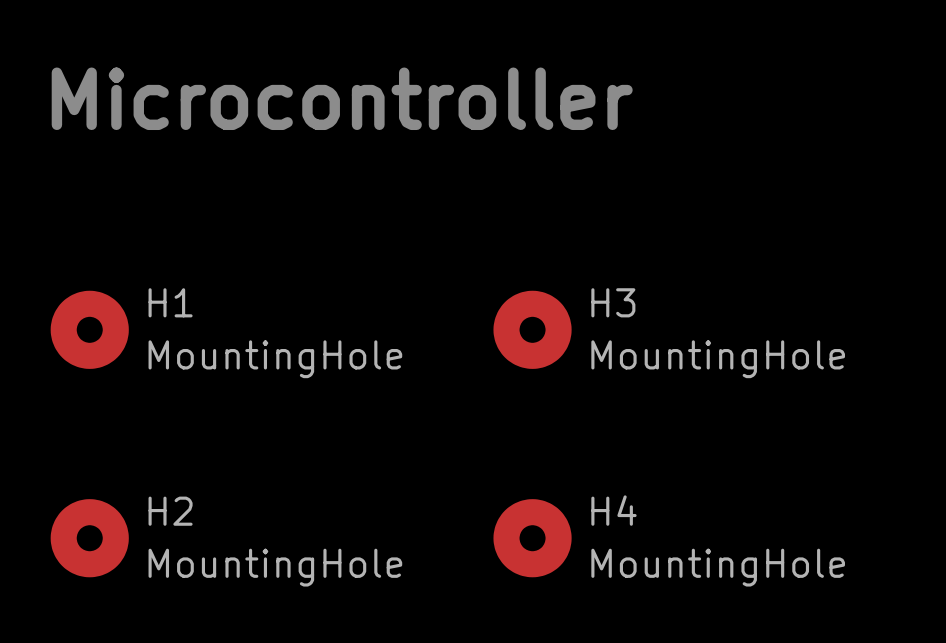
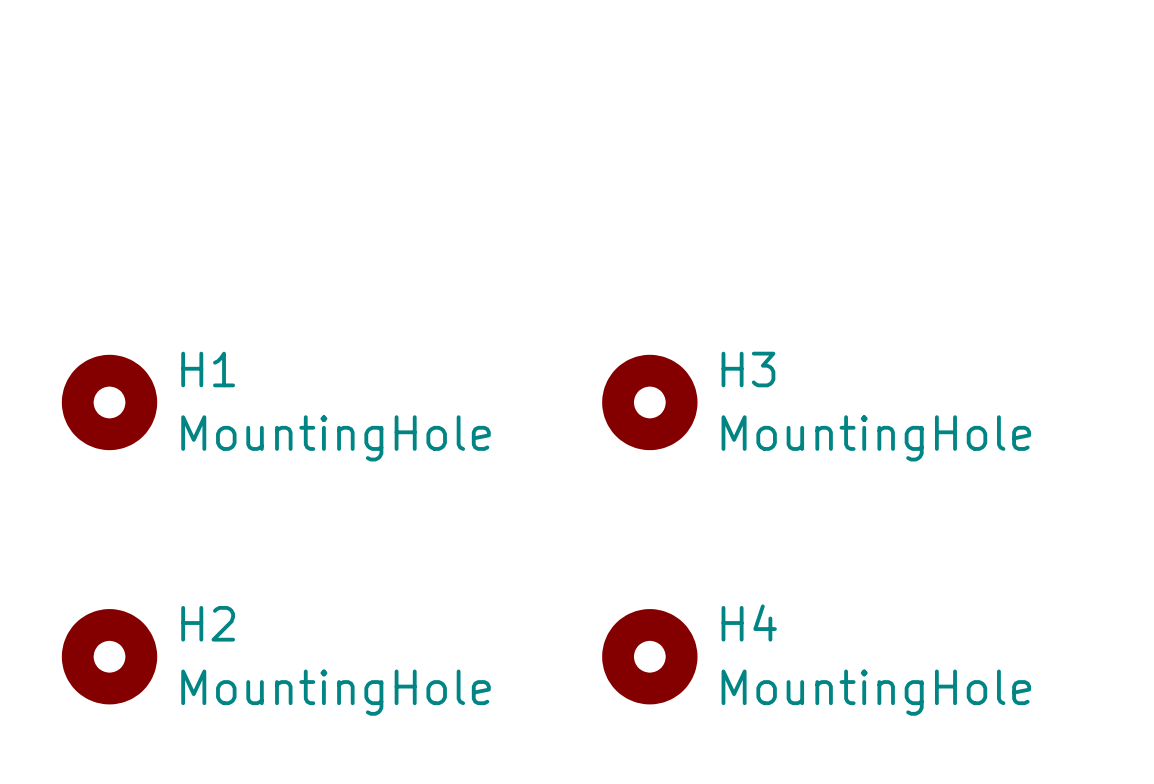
text: Microcontroller (342, 98) -> none

